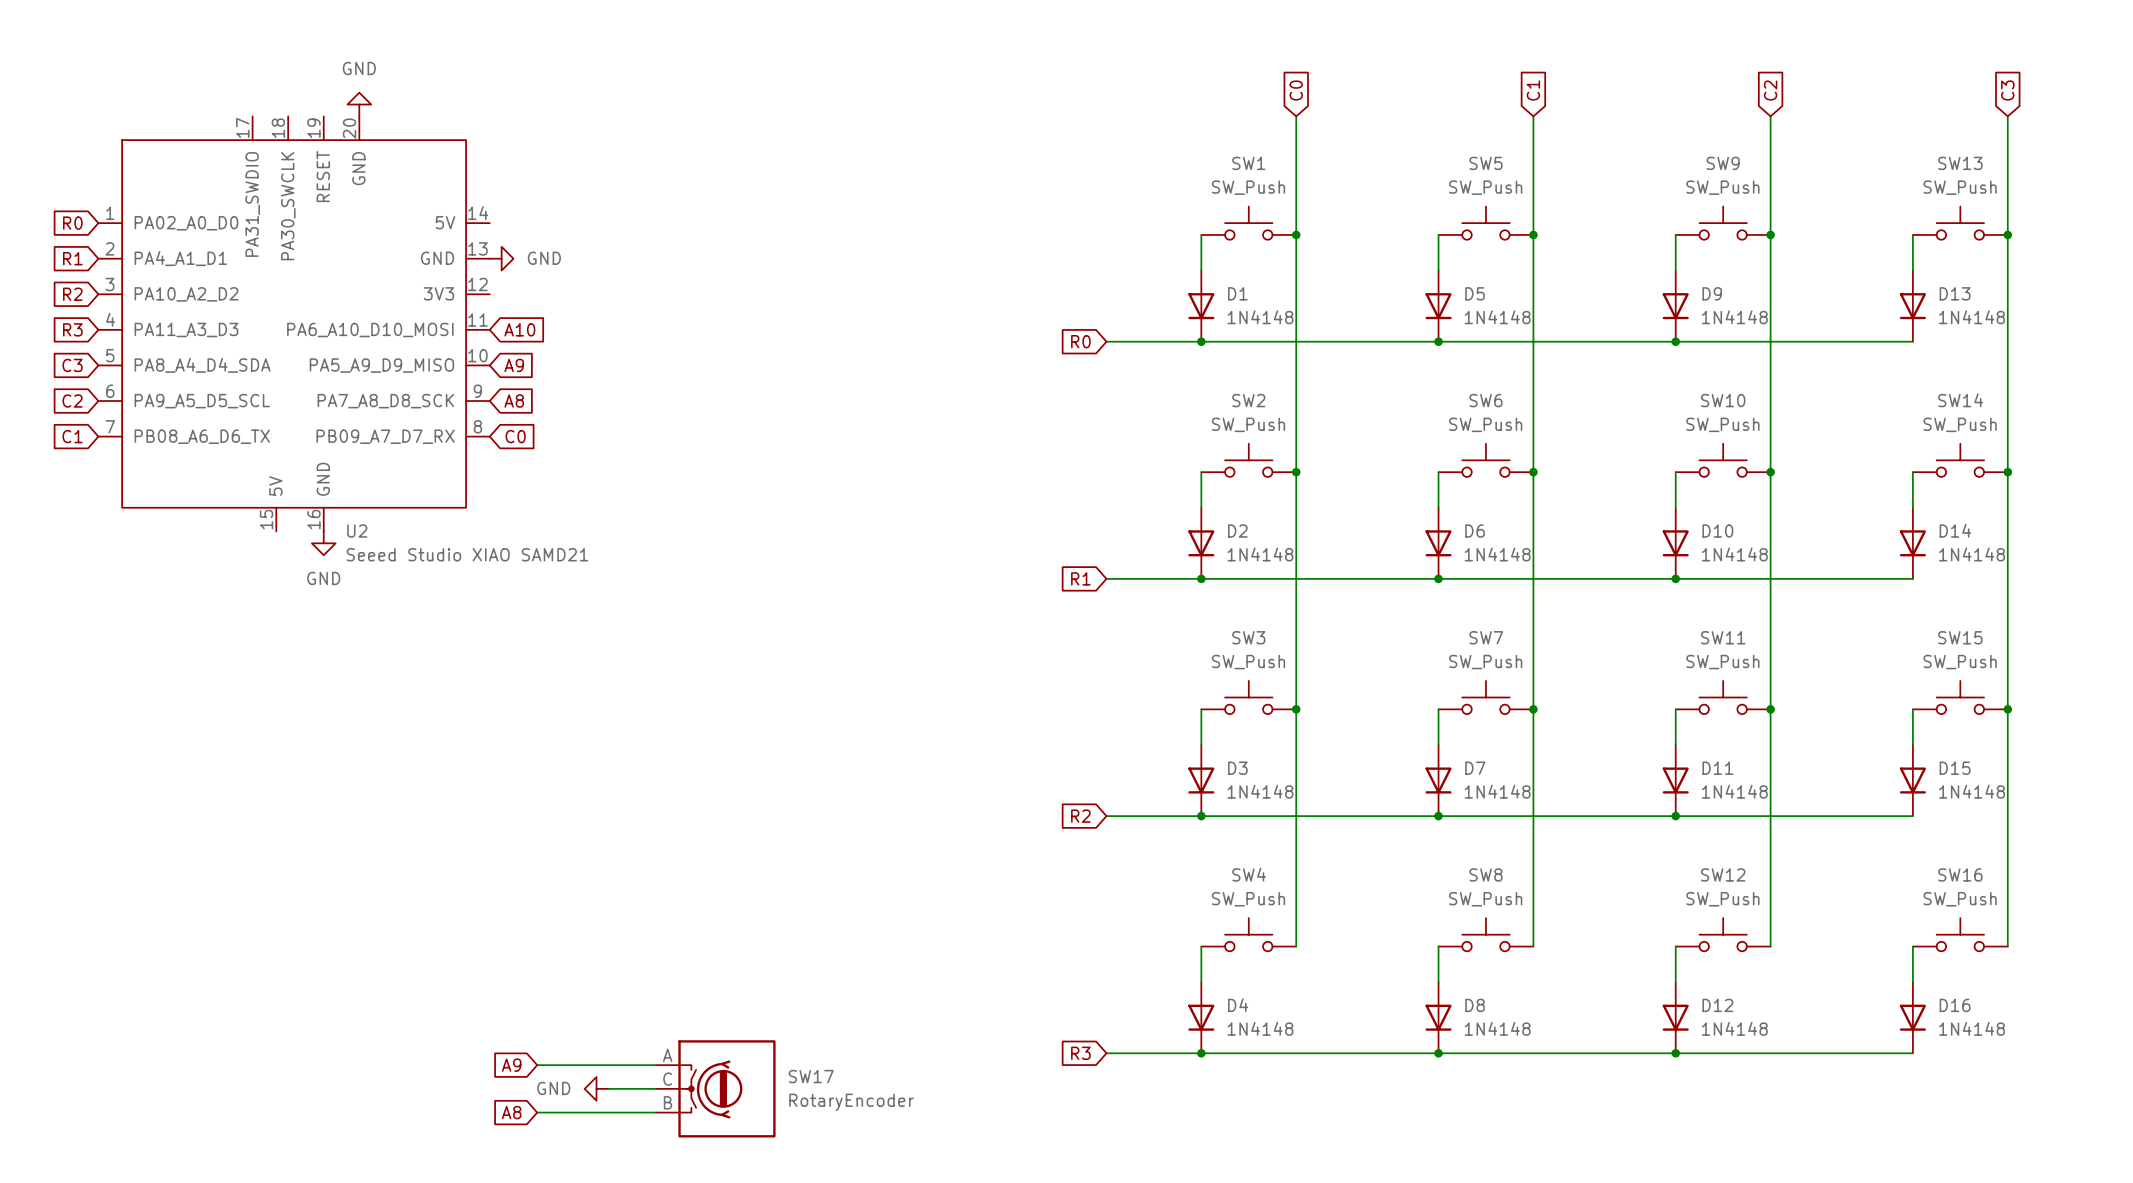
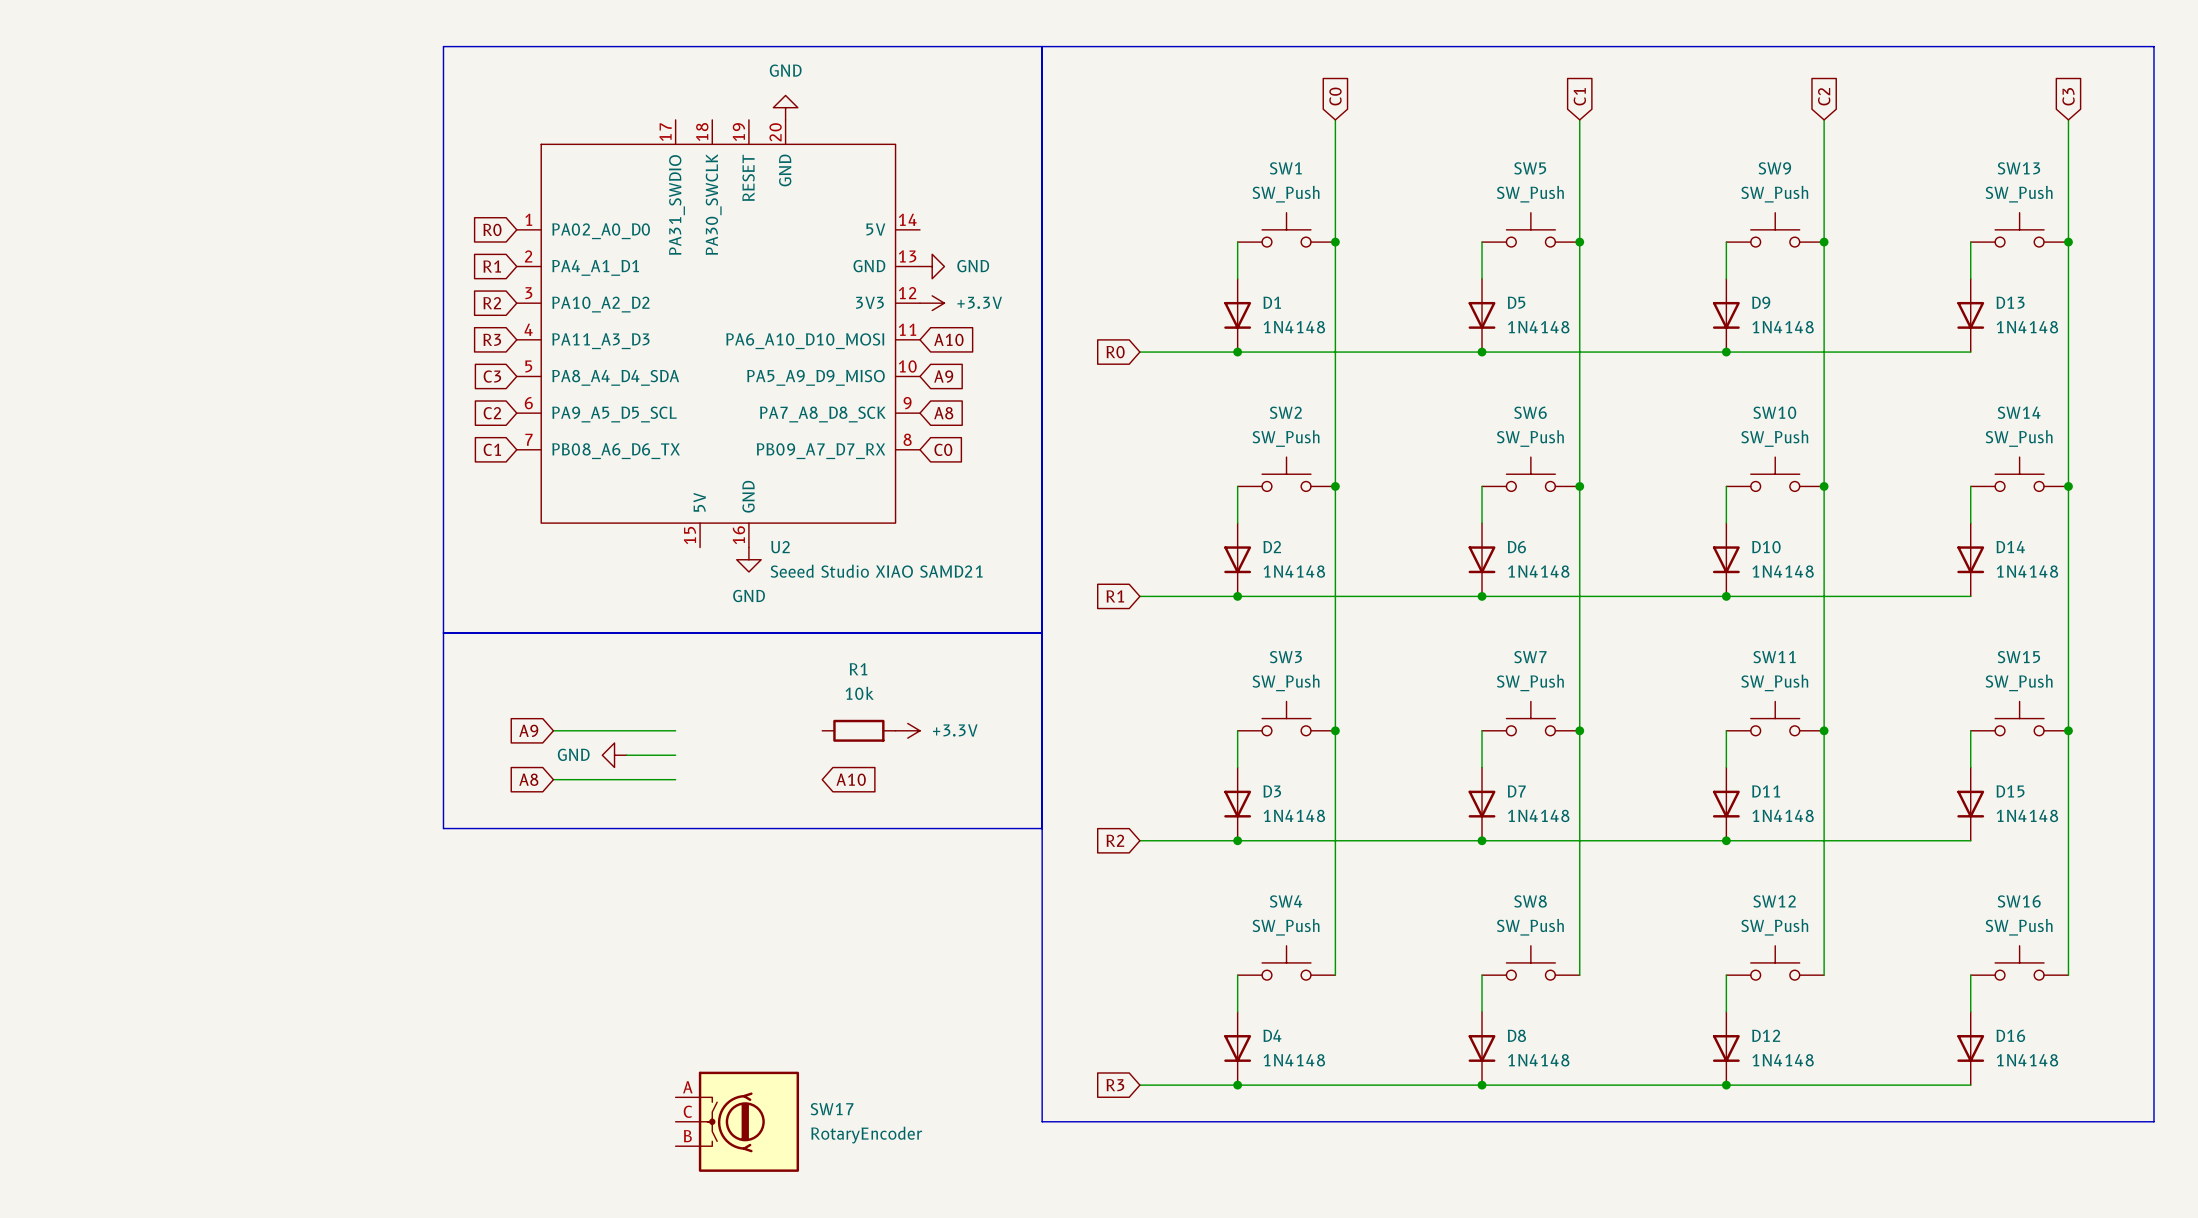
line: none -> (1042, 46) (1042, 1121) (2153, 1121) (2153, 46) (443, 46) (443, 828) (1042, 828)
power symbol: GND (359, 104) -> none
power symbol: none -> GND (785, 107)
global label: R0 (72, 223) -> none
global label: none -> R0 (492, 229)
global label: R1 (72, 258) -> none
global label: none -> R1 (492, 266)
power symbol: GND (501, 258) -> none
power symbol: none -> GND (932, 266)
global label: R2 (72, 294) -> none
global label: none -> R2 (492, 303)
power symbol: none -> +3.3V (932, 303)
U2 position: (294, 323) -> (718, 333)
global label: R3 (72, 329) -> none
global label: none -> R3 (492, 339)
global label: A10 (519, 329) -> none
global label: none -> A10 (948, 339)
global label: C3 (72, 365) -> none
global label: none -> C3 (492, 376)
global label: A9 (514, 365) -> none
global label: none -> A9 (943, 376)
global label: C2 (72, 401) -> none
global label: none -> C2 (492, 413)
global label: A8 (514, 401) -> none
global label: none -> A8 (943, 413)
global label: C1 (72, 436) -> none
global label: none -> C1 (492, 449)
global label: C0 (515, 436) -> none
global label: none -> C0 (943, 449)
power symbol: GND (323, 543) -> none
power symbol: none -> GND (748, 559)
line: none -> (443, 633) (1042, 633)
global label: none -> A9 (528, 730)
wire: none -> (553, 730) (675, 730)
R1: none -> 10k (858, 730)
power symbol: none -> +3.3V (907, 730)
power symbol: none -> GND (614, 755)
wire: none -> (626, 755) (675, 755)
global label: none -> A8 (528, 779)
wire: none -> (553, 779) (675, 779)
global label: none -> A10 (851, 779)
global label: A9 (511, 1065) -> none
wire: (537, 1065) (655, 1065) -> none
power symbol: GND (596, 1088) -> none
wire: (608, 1088) (655, 1088) -> none
global label: A8 (511, 1112) -> none
wire: (537, 1112) (655, 1112) -> none

